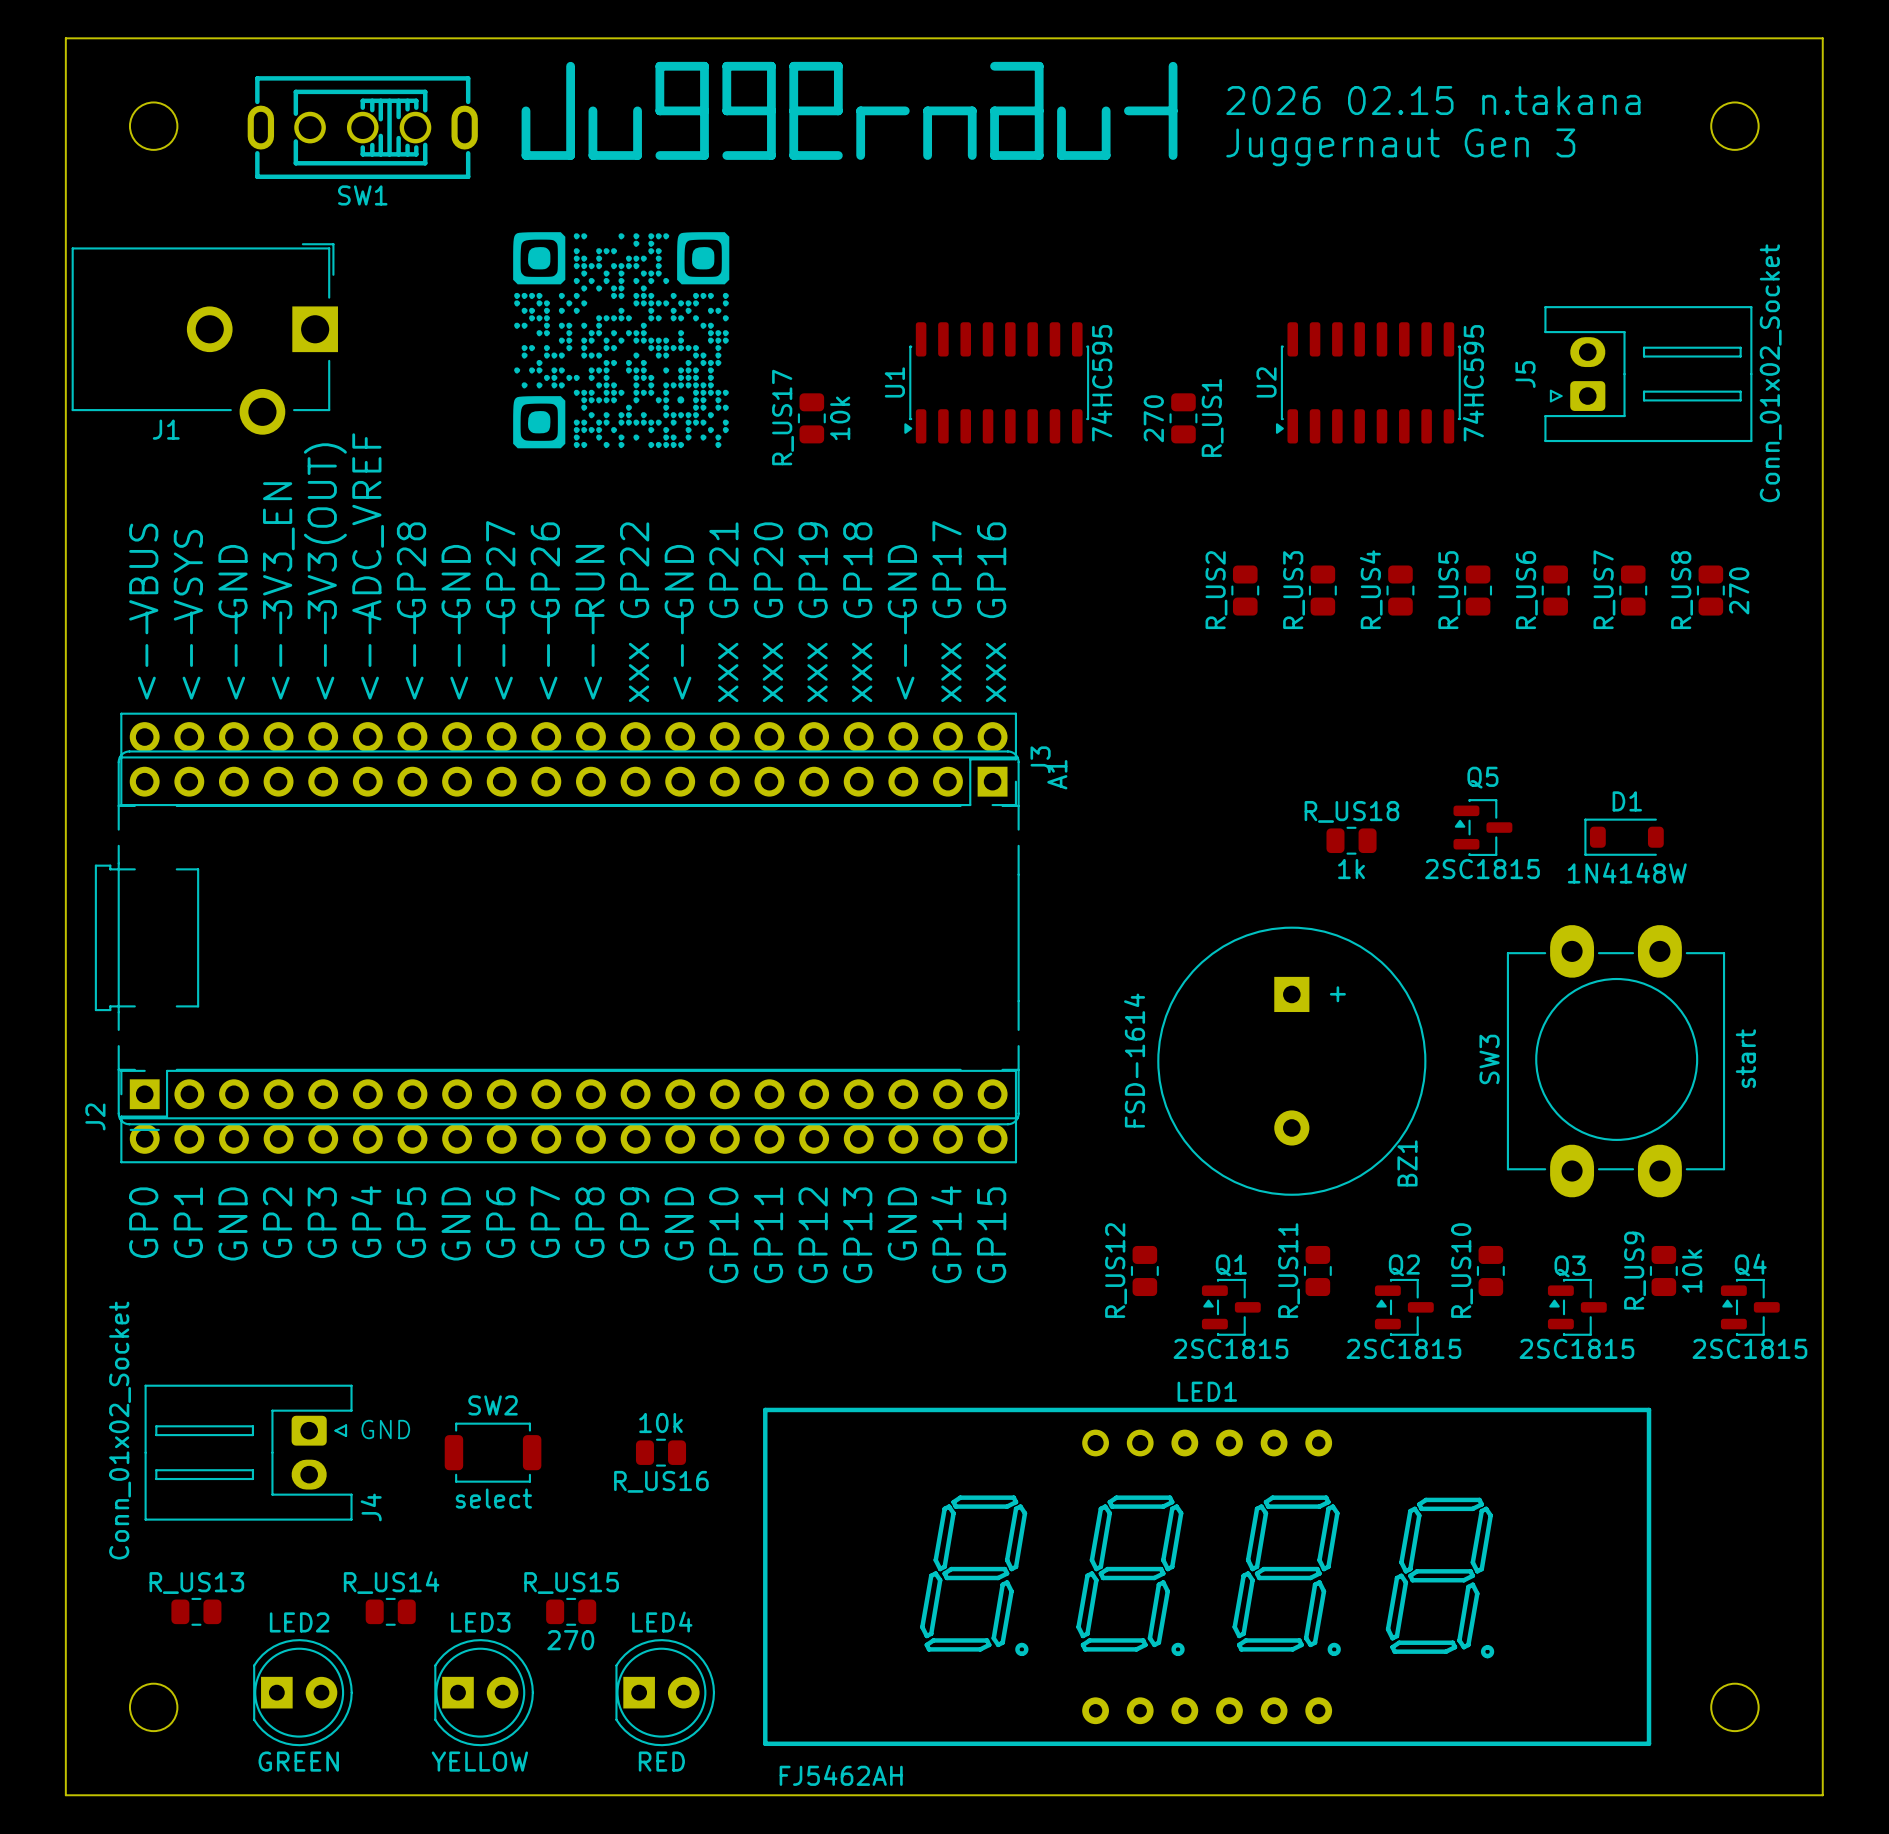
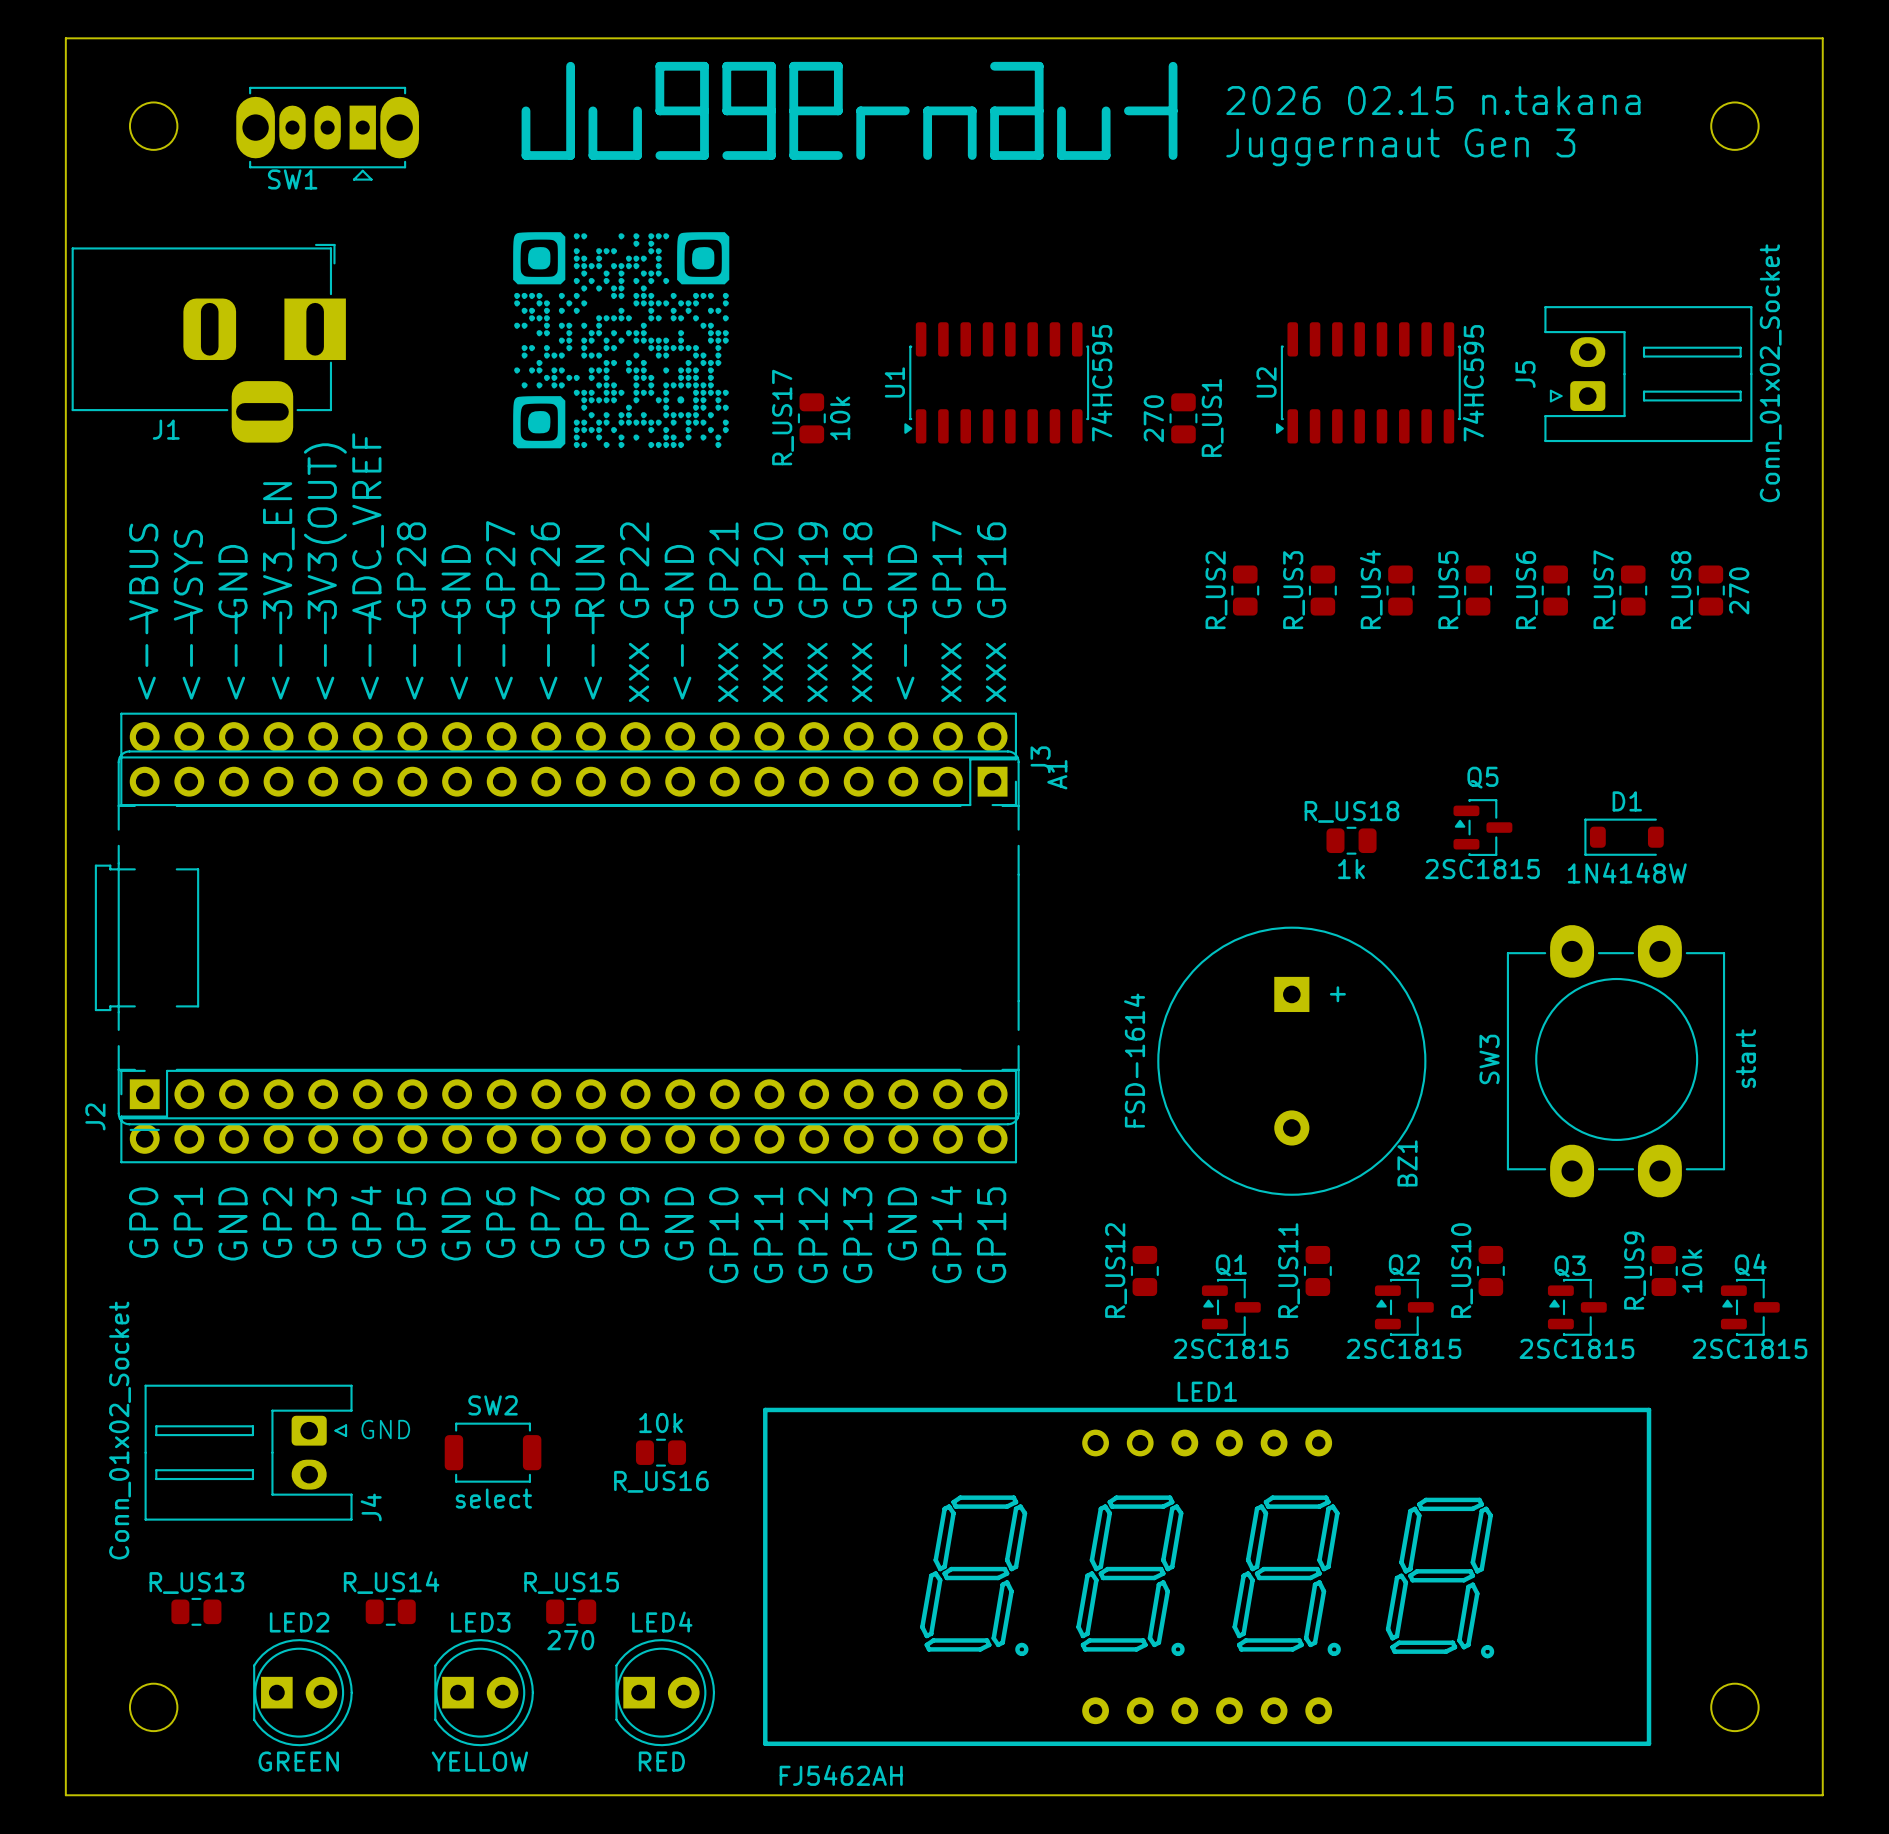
SW1 footprint: [247, 76, 478, 180] -> [236, 86, 419, 181]
SW1 name position: SW1 (362, 195) -> SW1 (292, 179)
J1 footprint: [71, 243, 338, 435] -> [71, 243, 346, 443]

